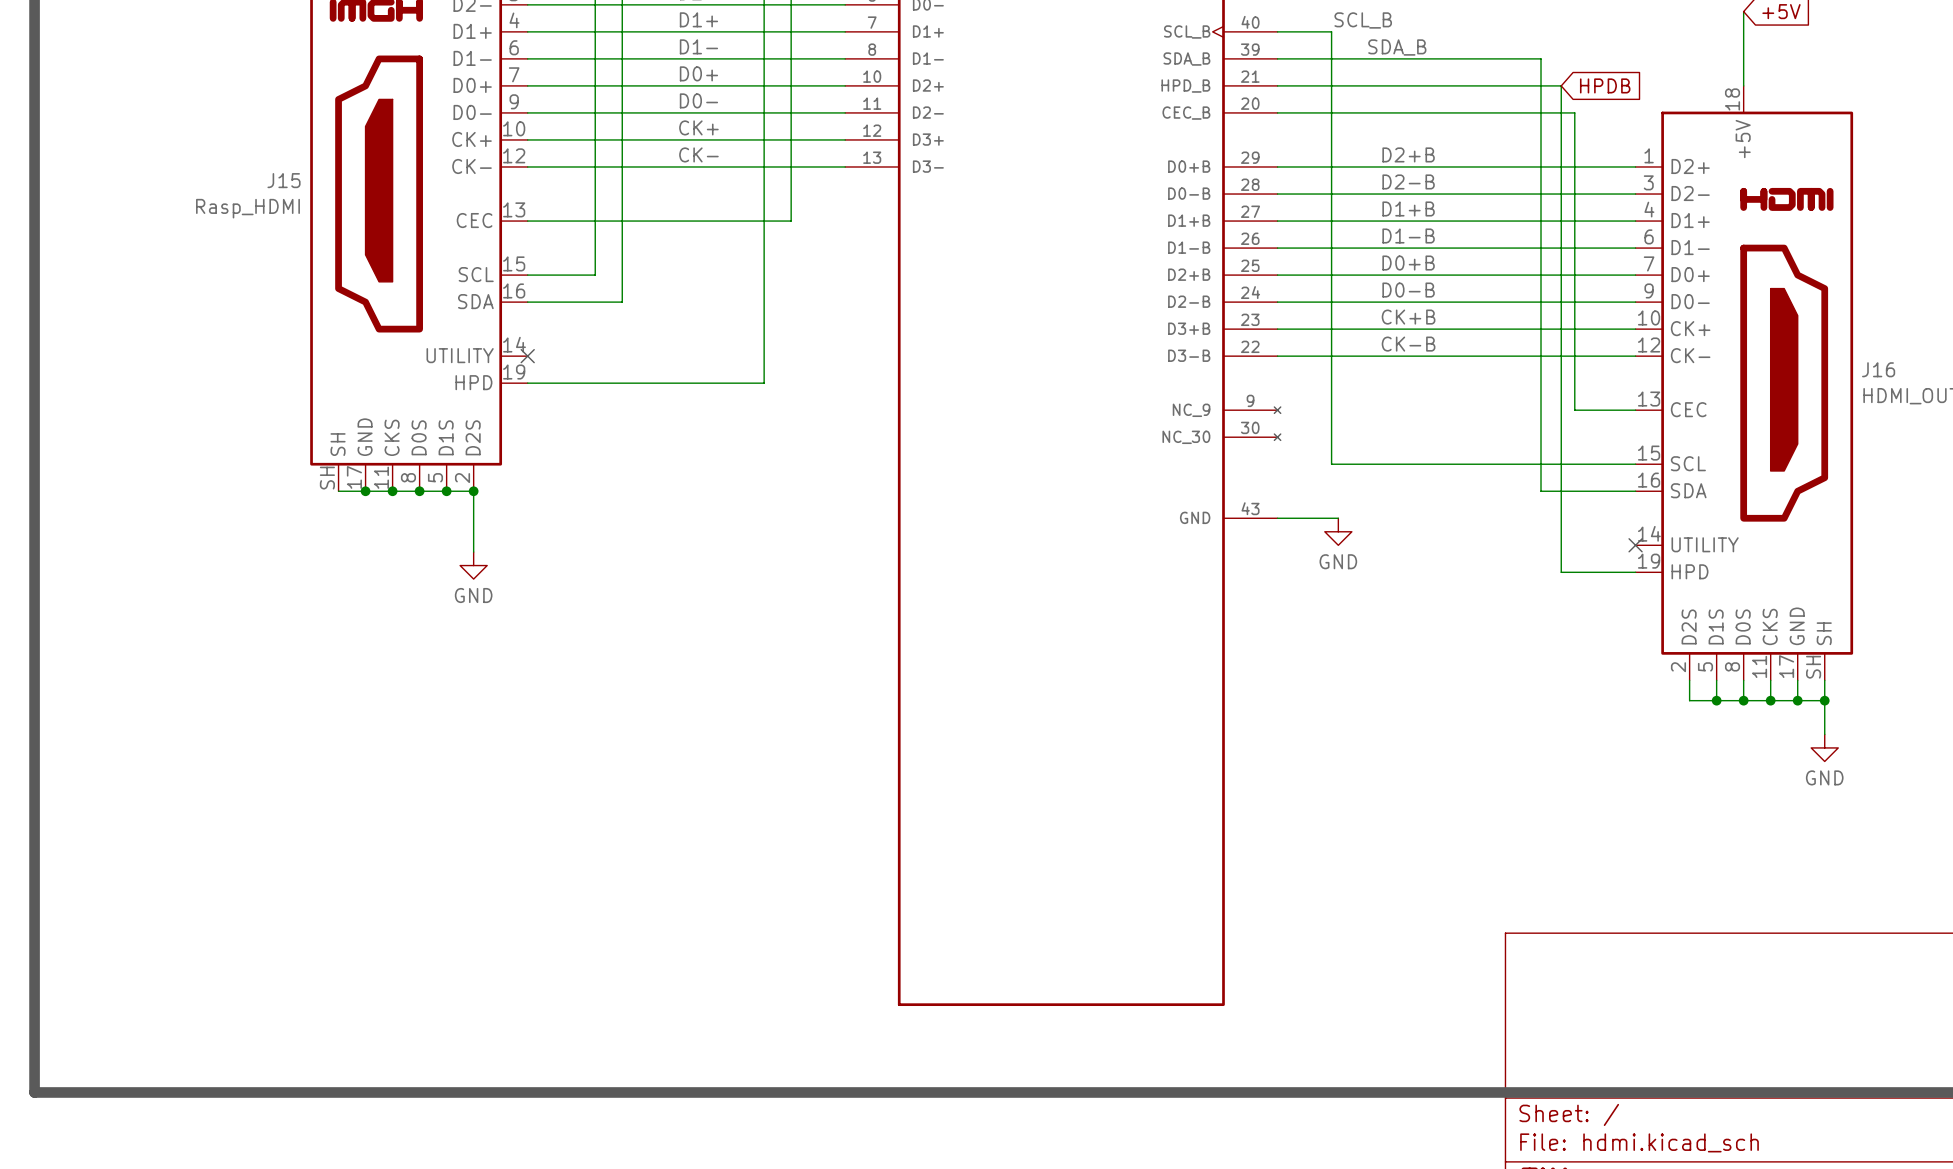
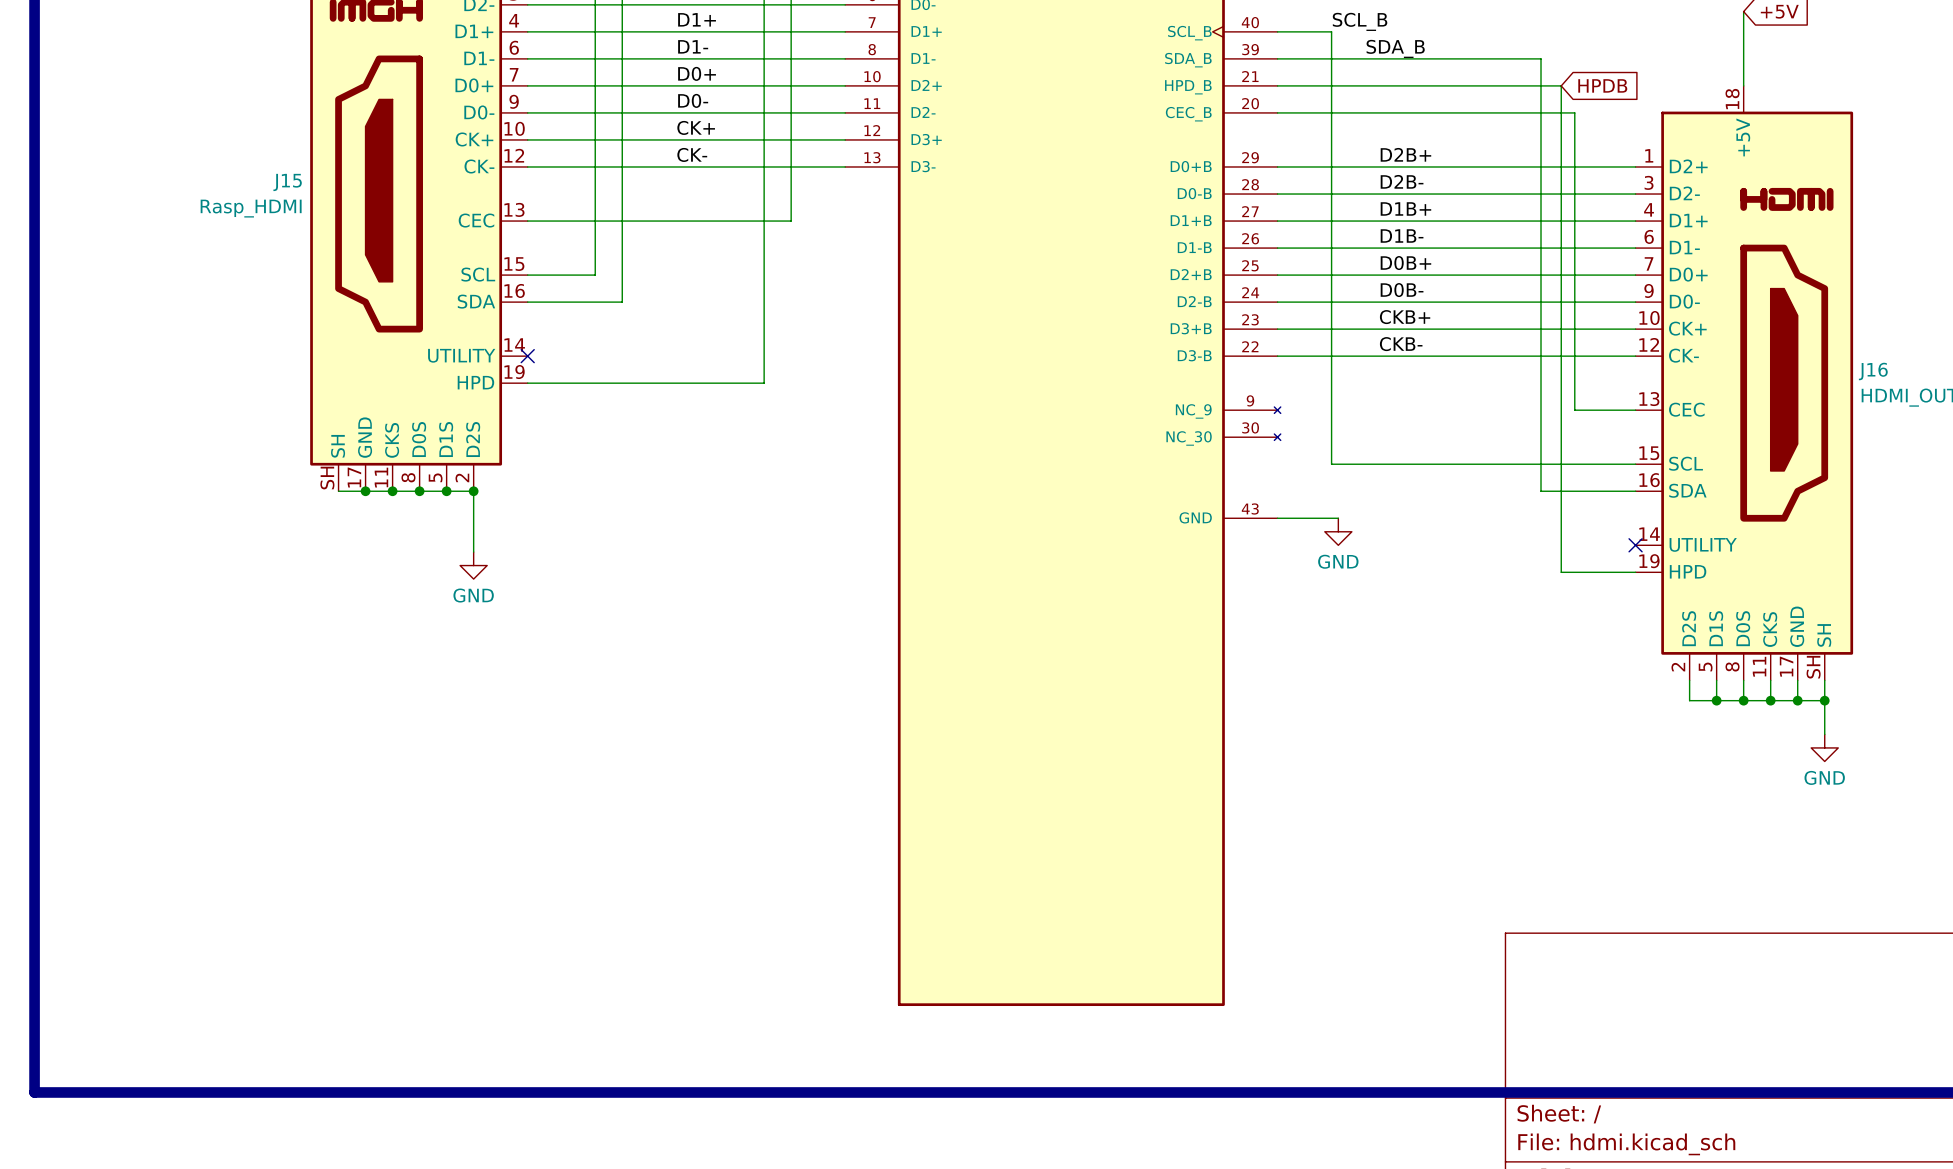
label: D2+B (1408, 154) -> D2B+ (1405, 154)
label: D2-B (1408, 181) -> D2B- (1402, 181)
label: D1+B (1408, 208) -> D1B+ (1405, 208)
label: D1-B (1408, 236) -> D1B- (1402, 236)
label: D0+B (1408, 263) -> D0B+ (1405, 263)
label: D0-B (1408, 290) -> D0B- (1402, 290)
label: CK+B (1408, 317) -> CKB+ (1405, 317)
label: CK-B (1408, 344) -> CKB- (1401, 344)

